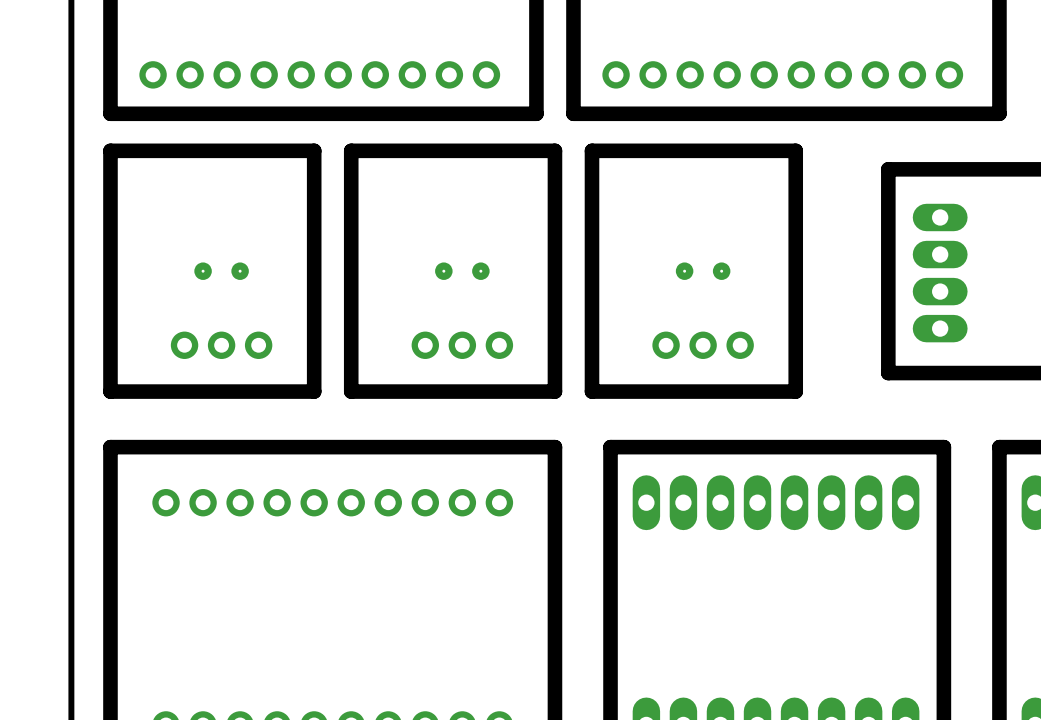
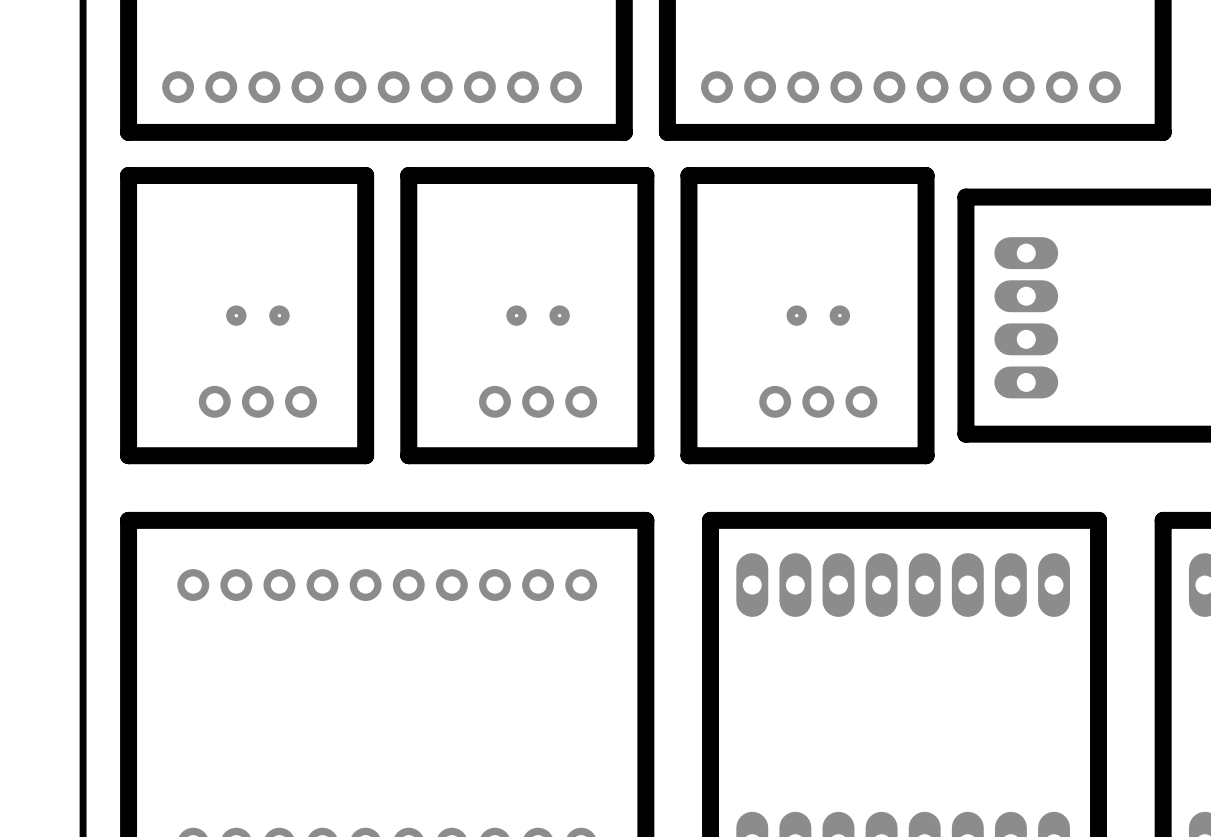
board edge: (888, 169) (888, 373) -> (1033, 197) (965, 197) (965, 434) (1033, 434)
part position: (940, 273) -> (1026, 317)

